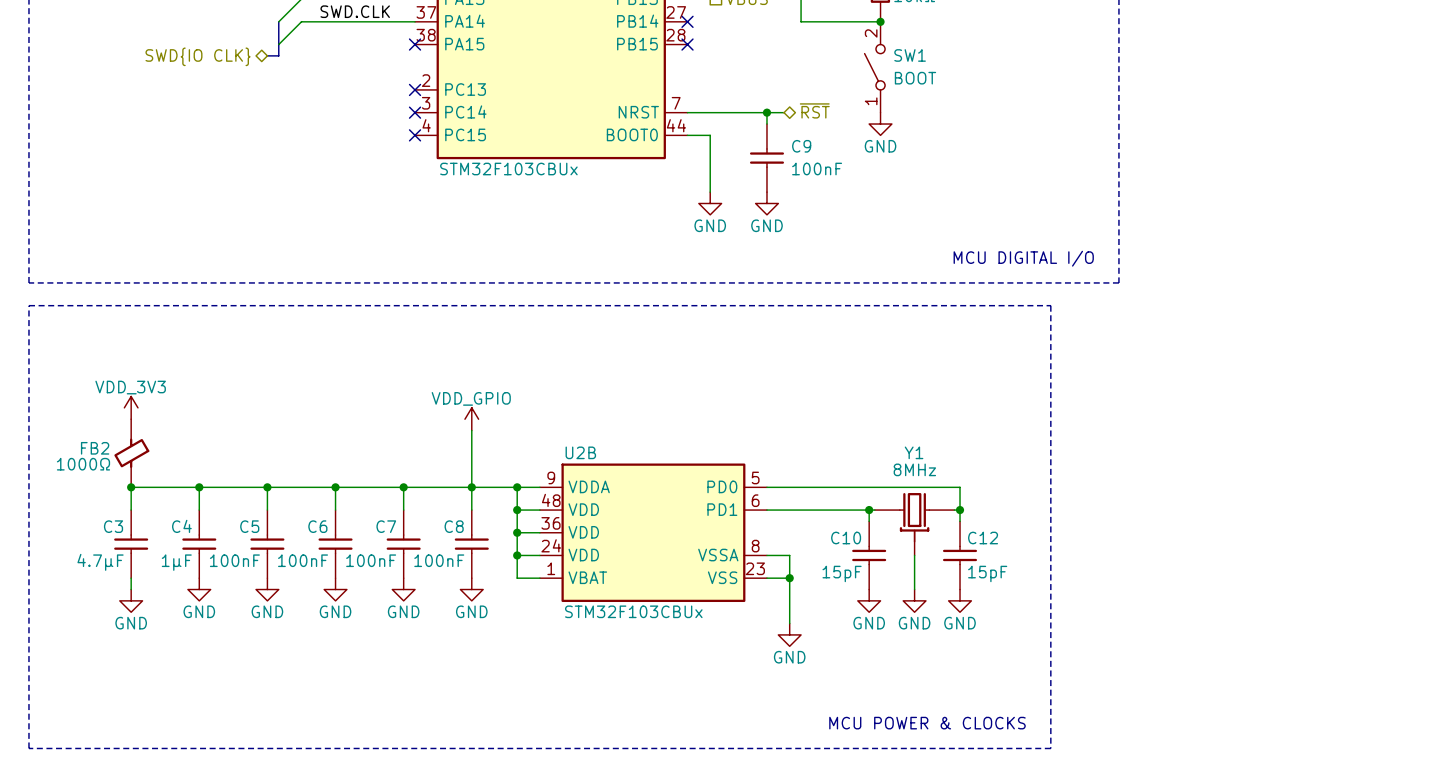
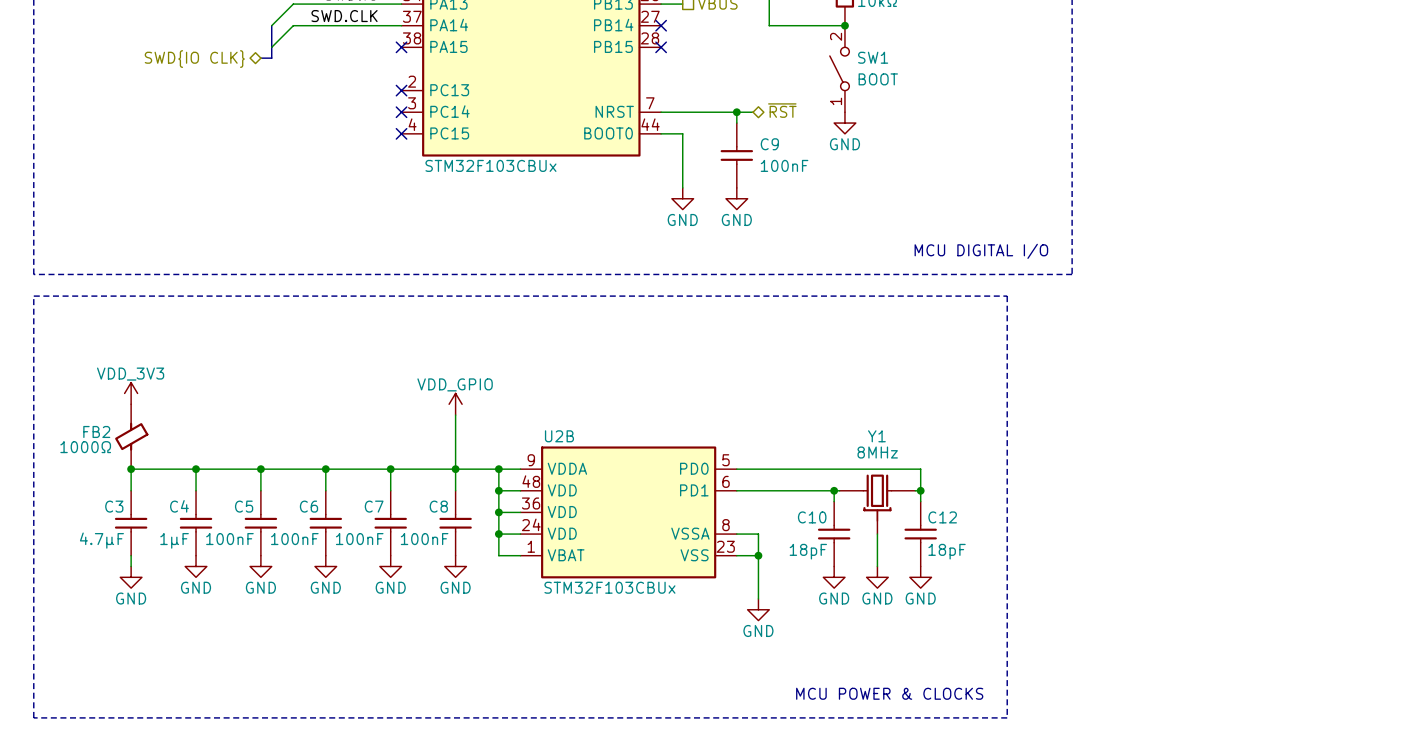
C10 value: 15pF (842, 573) -> 18pF (808, 551)
C12 value: 15pF (987, 573) -> 18pF (947, 551)

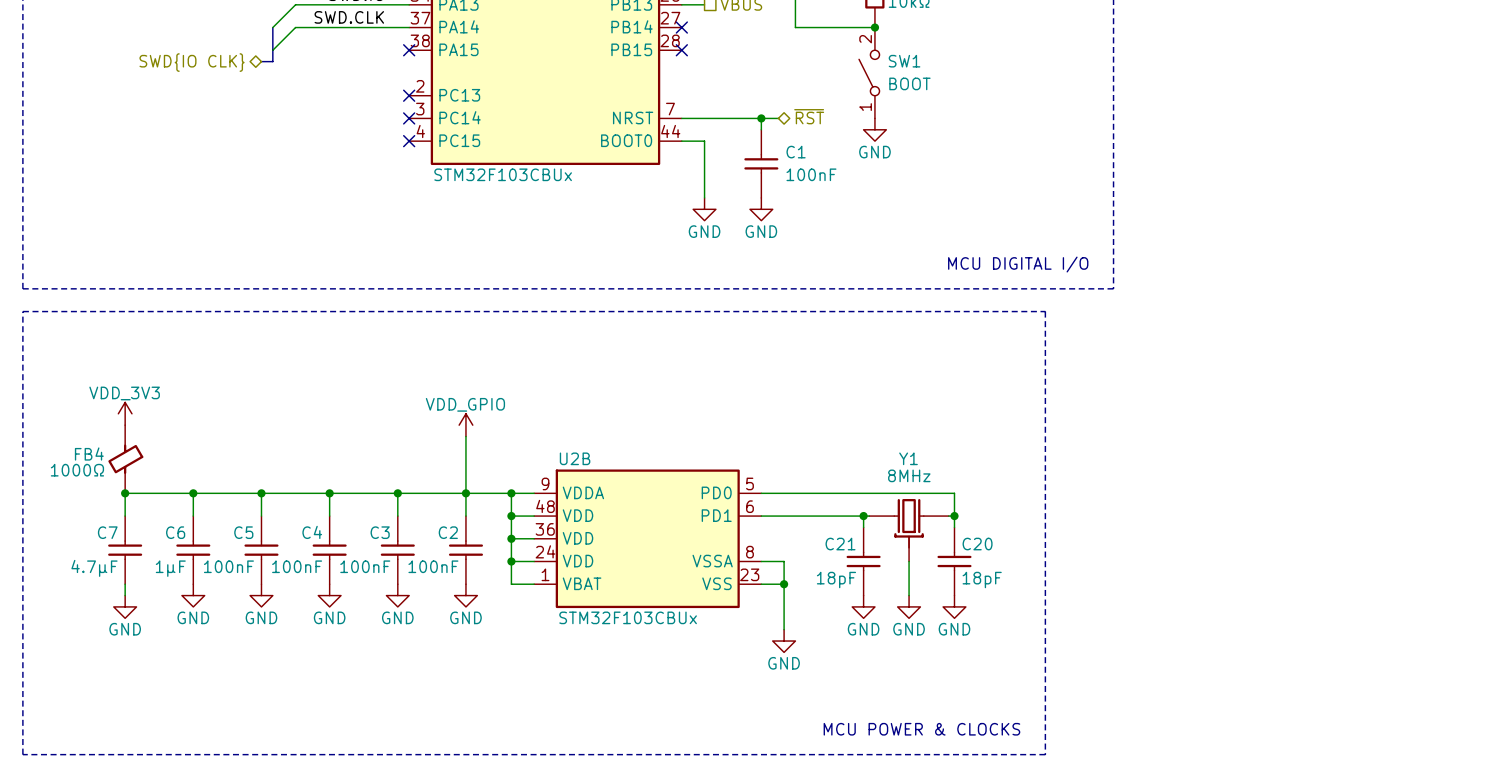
C9 name: C9 (769, 144) -> C1 (796, 152)
FB2 name: FB2 (96, 431) -> FB4 (89, 454)
C3 name: C3 (114, 506) -> C7 (107, 532)
C4 name: C4 (179, 506) -> C6 (175, 532)
C6 name: C6 (308, 506) -> C4 (312, 532)
C7 name: C7 (374, 506) -> C3 (380, 532)
C8 name: C8 (438, 506) -> C2 (448, 532)
C10 name: C10 (812, 517) -> C21 (840, 544)
C12 name: C12 (942, 517) -> C20 (977, 544)

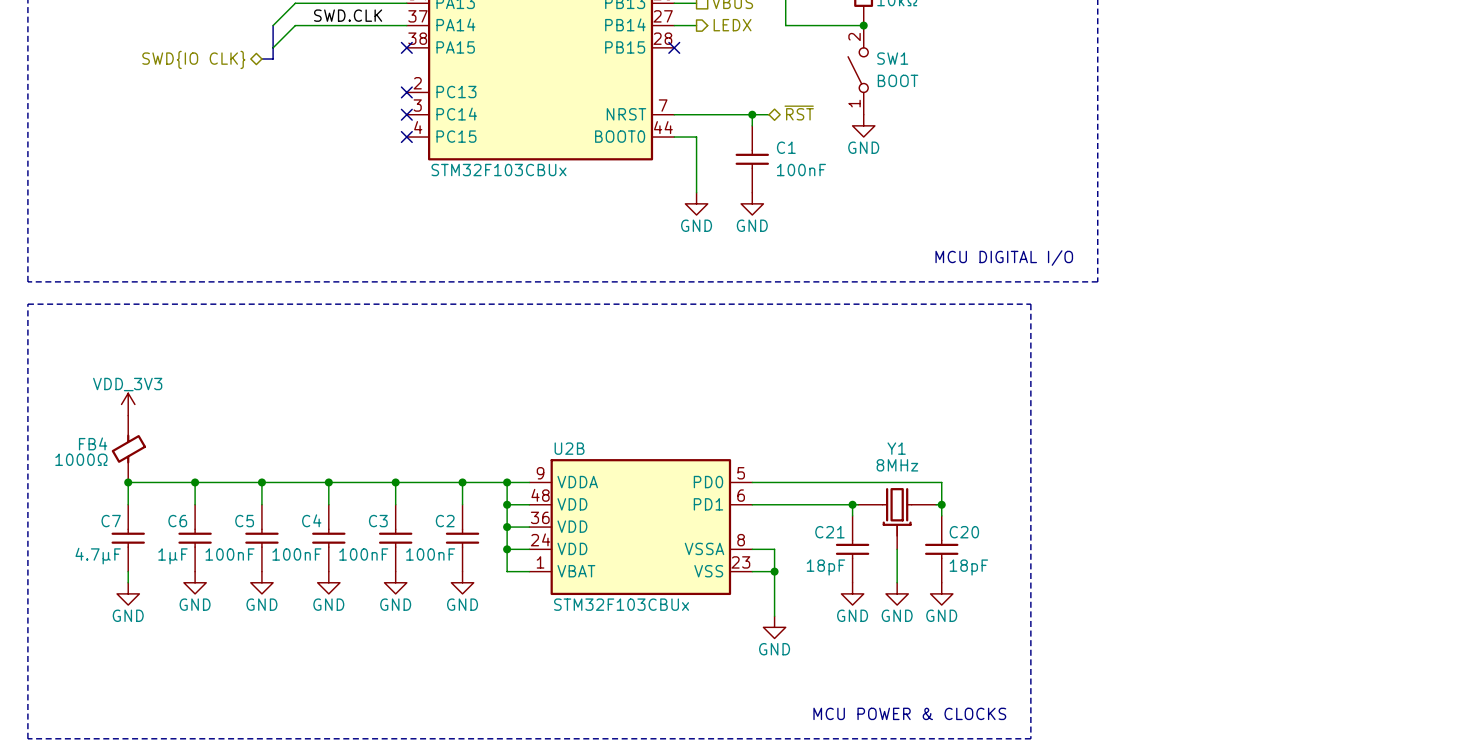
wire: none -> (674, 25) (696, 25)
no-connect mark: (681, 27) -> none
hierarchical label: none -> LEDX (732, 25)
power symbol: VDD_GPIO (465, 425) -> none
wire: (465, 436) (465, 493) -> none

